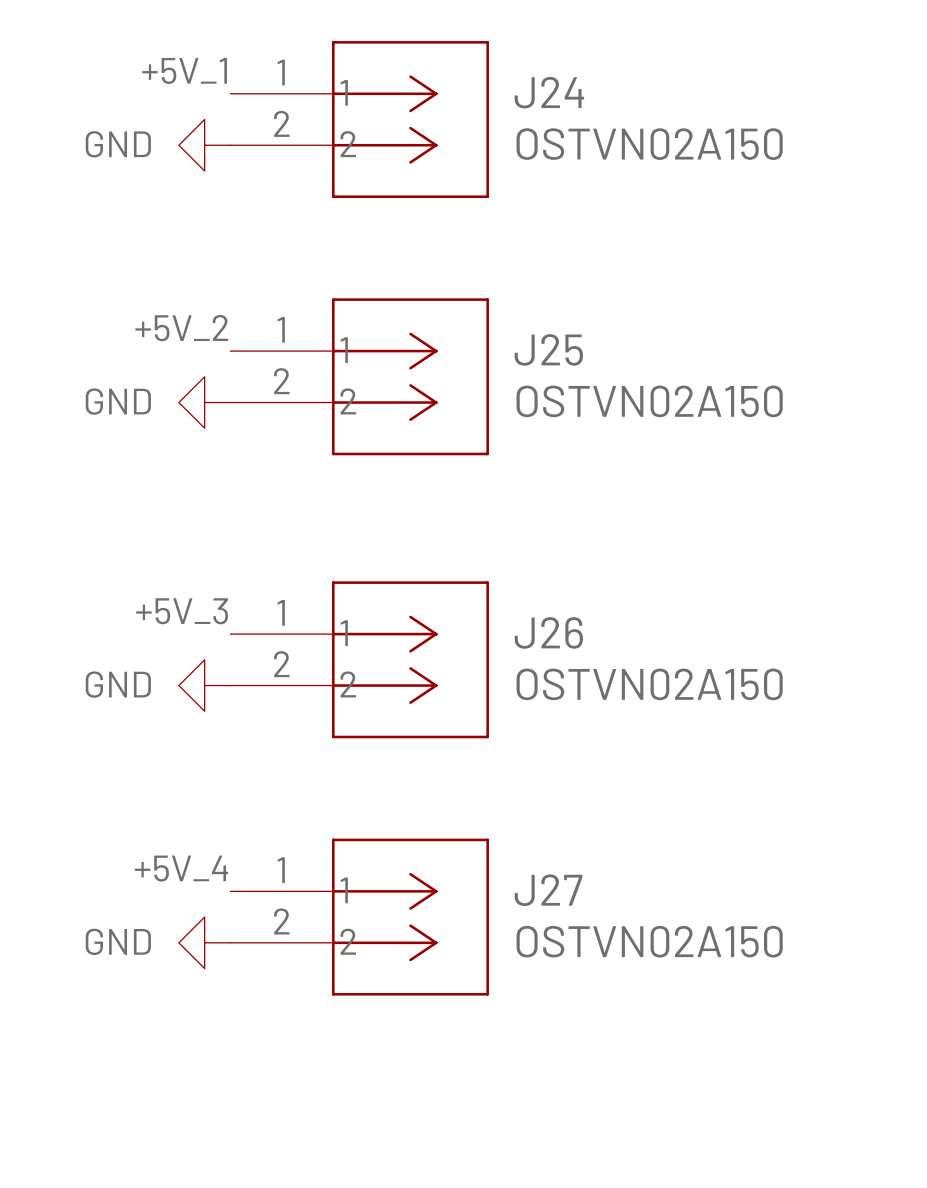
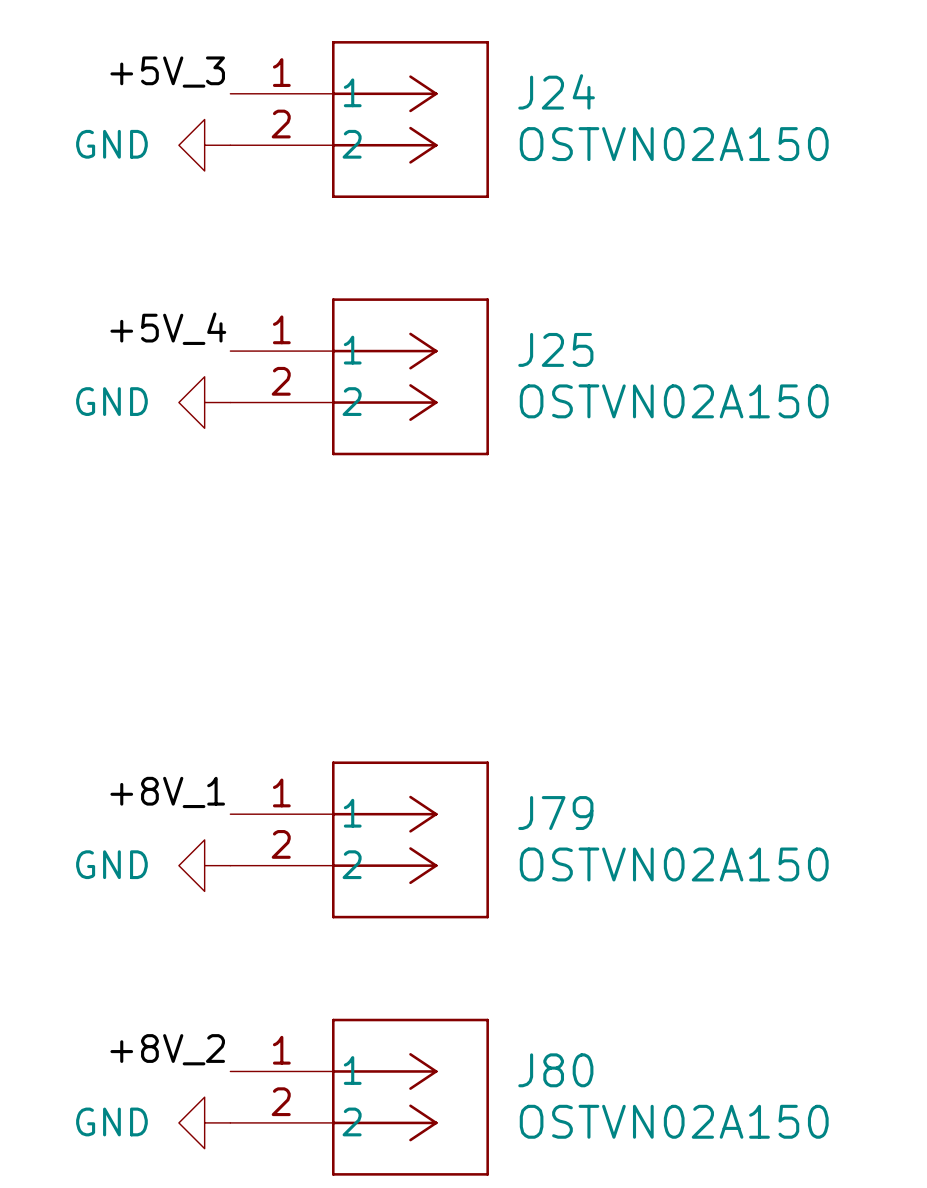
label: +5V_1 (184, 70) -> +5V_3 (167, 72)
label: +5V_2 (181, 328) -> +5V_4 (168, 328)
label: +5V_3 (182, 611) -> none
J26: OSTVN02A150 (359, 659) -> none
power symbol: GND (204, 685) -> none
label: none -> +8V_1 (167, 792)
J79: none -> OSTVN02A150 (359, 839)
label: +5V_4 (181, 868) -> none
J27: OSTVN02A150 (359, 917) -> none
power symbol position: GND (204, 942) -> GND (204, 865)
label: none -> +8V_2 (167, 1049)
J80: none -> OSTVN02A150 (359, 1097)
power symbol: none -> GND (204, 1122)

